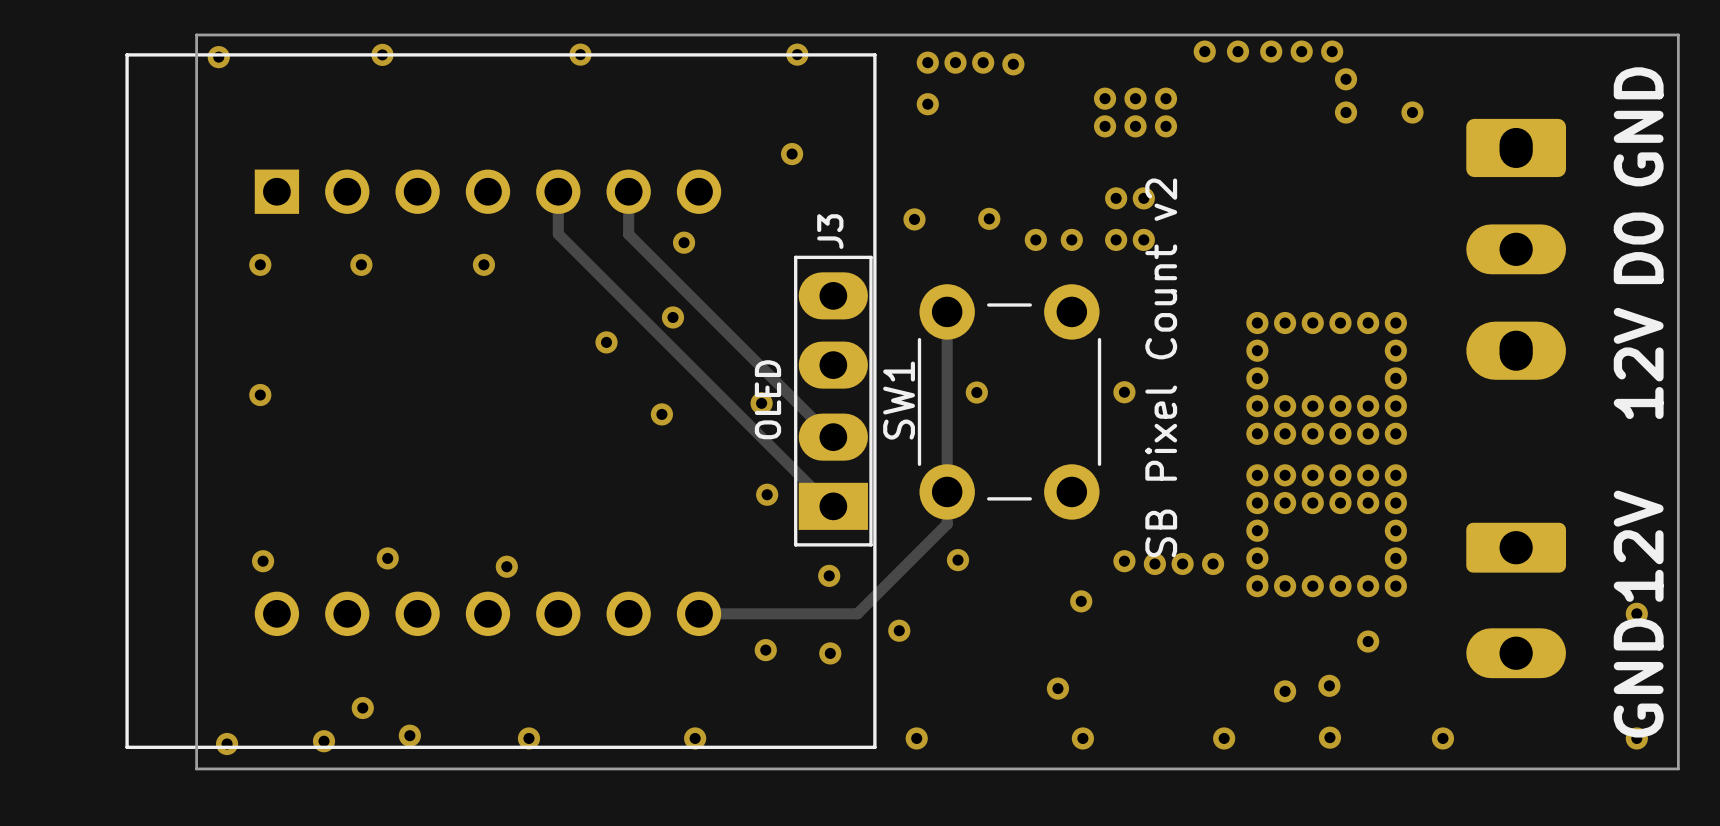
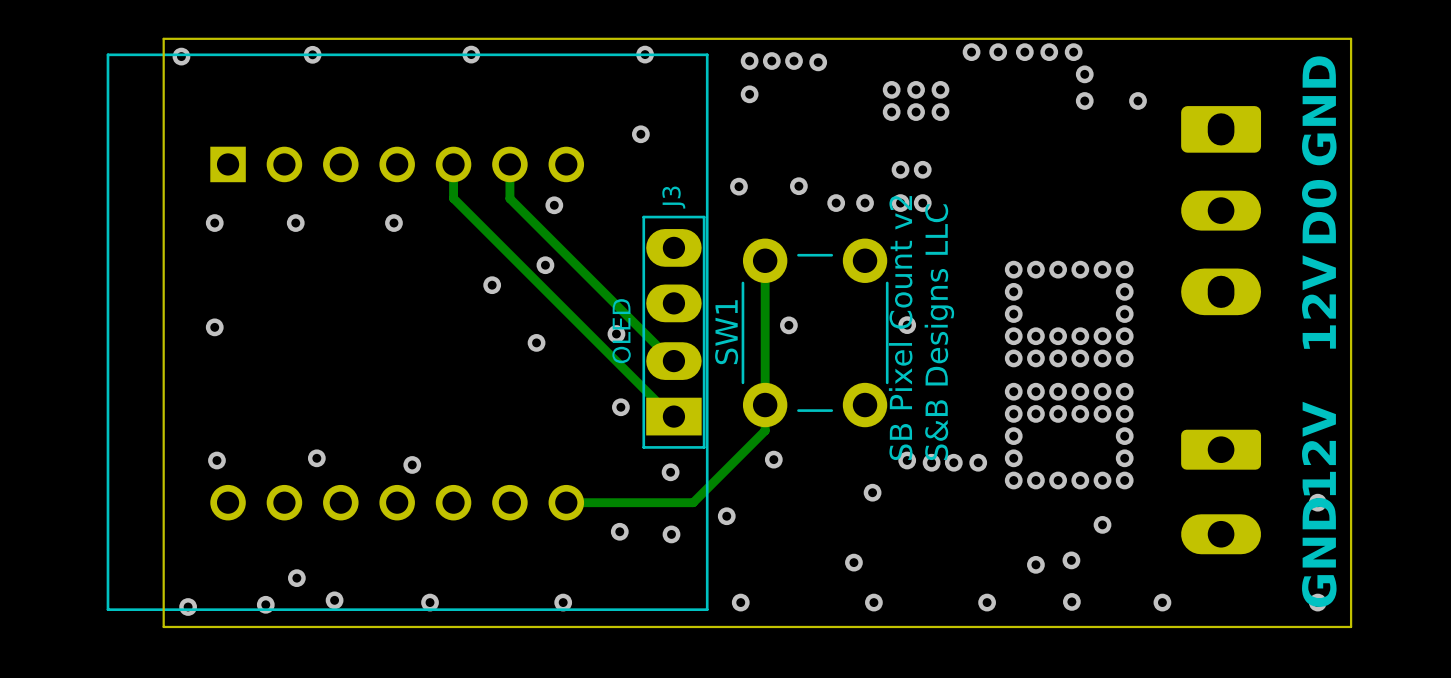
text: none -> SB Pixel Count v2 (900, 328)
text: SB Pixel Count v2 (1161, 367) -> S&B Designs LLC (939, 332)

